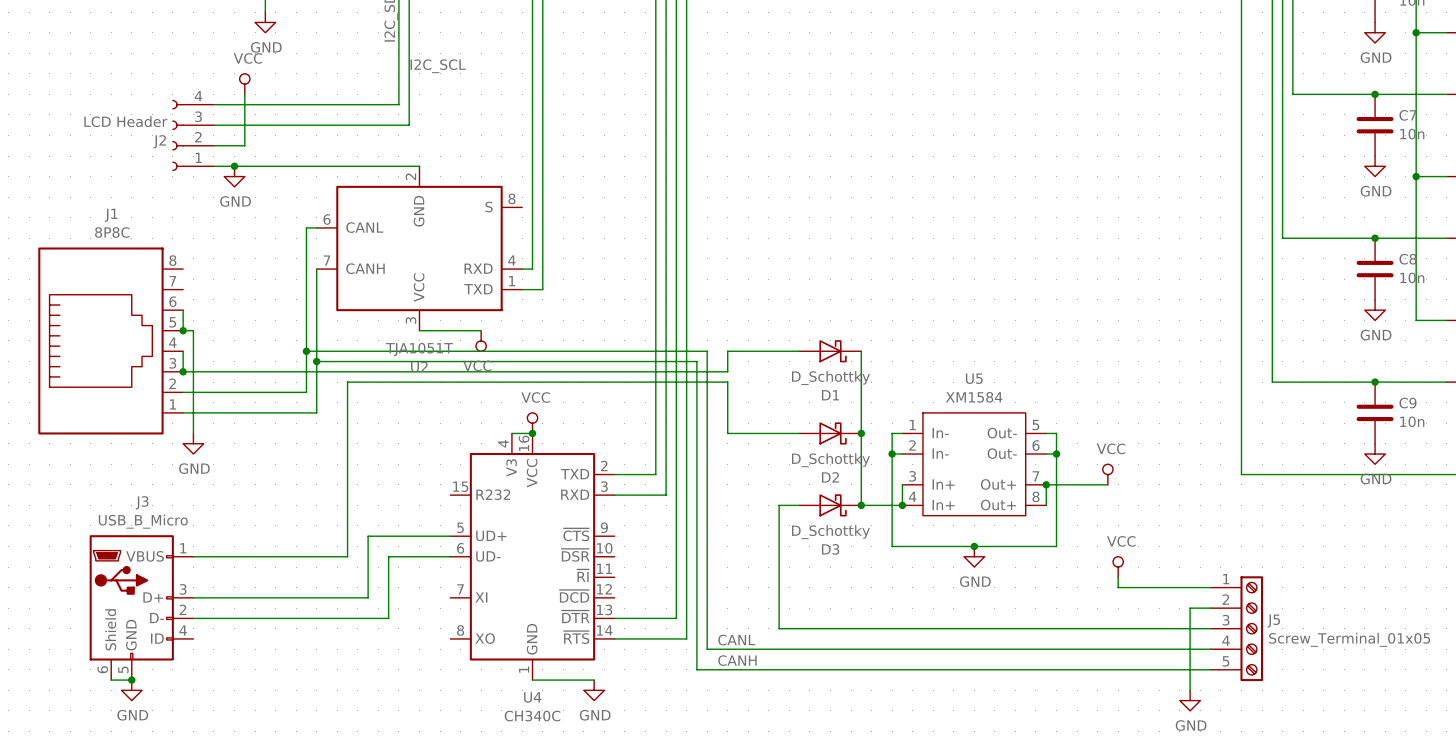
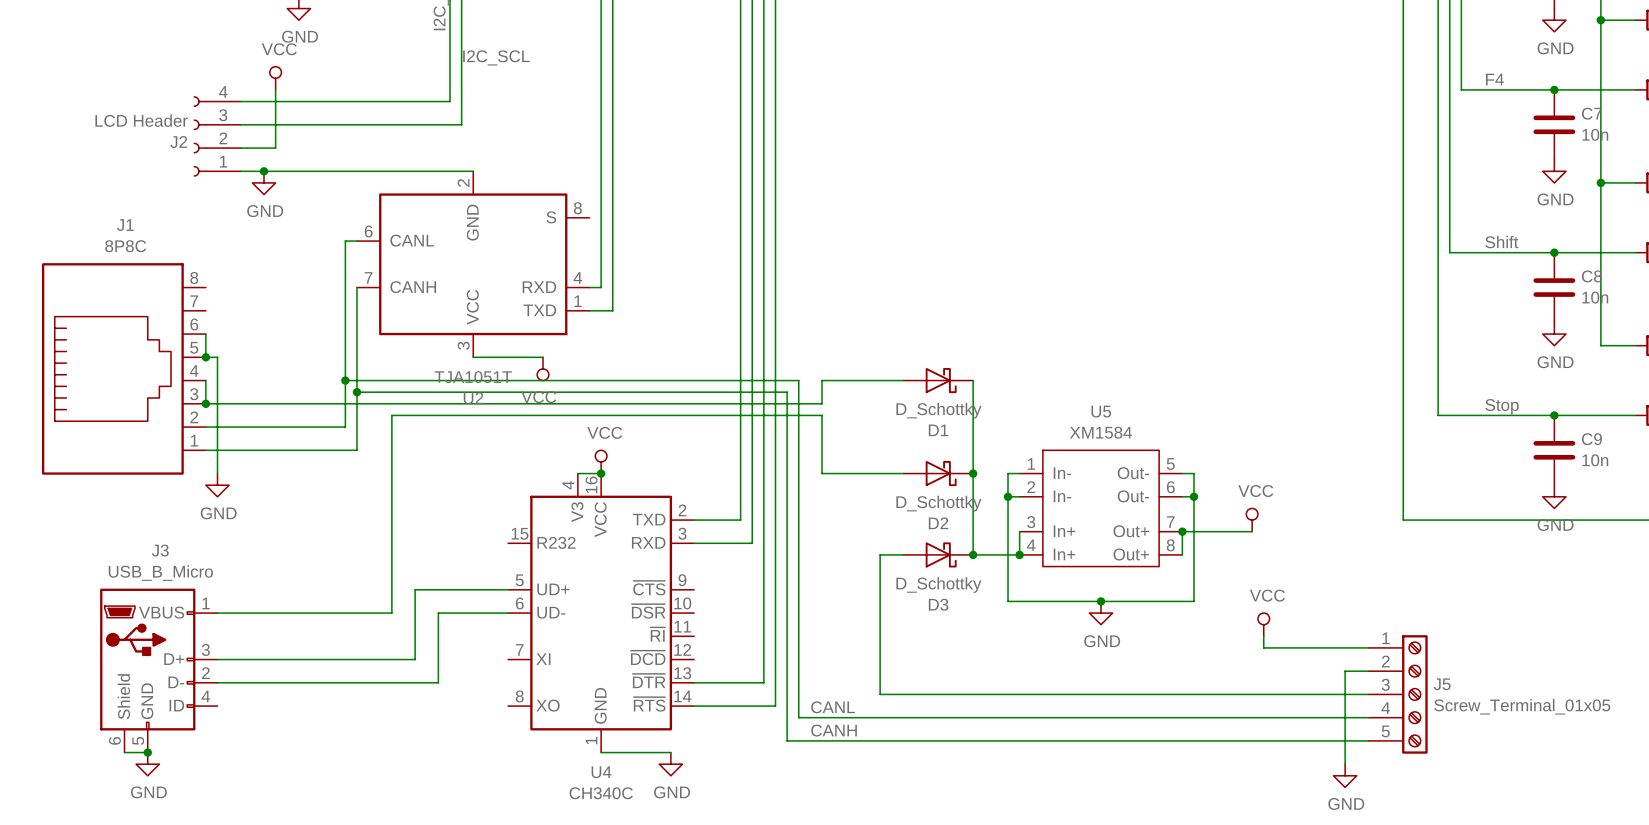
label: none -> F4 (1494, 79)
label: none -> Shift (1501, 242)
label: none -> Stop (1502, 406)

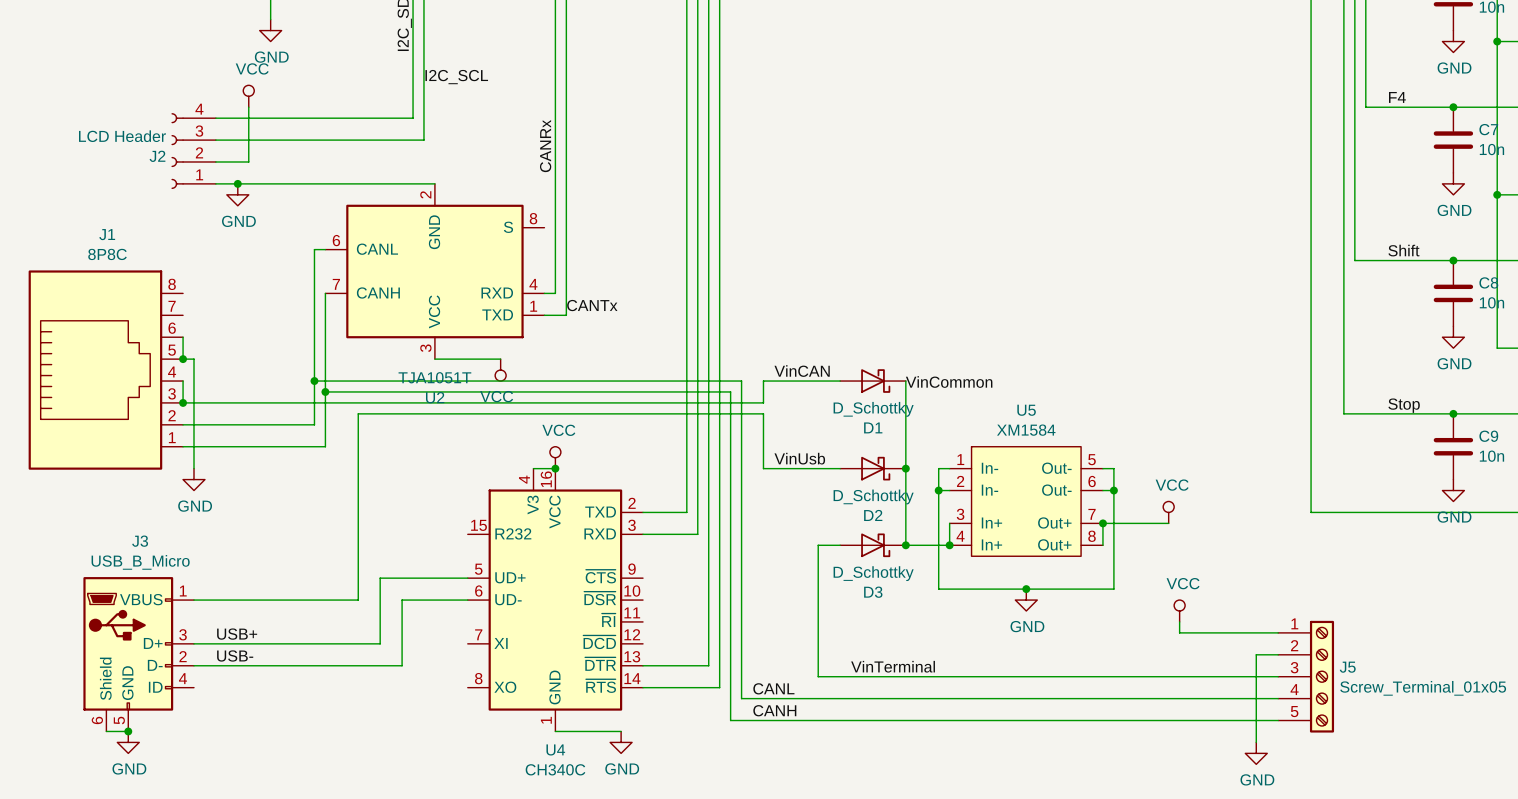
label: none -> CANRx (545, 146)
label: none -> CANTx (592, 305)
label: none -> VinCAN (802, 371)
label: none -> VinCommon (949, 381)
label: none -> VinUsb (799, 458)
label: none -> USB+ (237, 634)
label: none -> USB- (235, 655)
label: none -> VinTerminal (893, 666)

